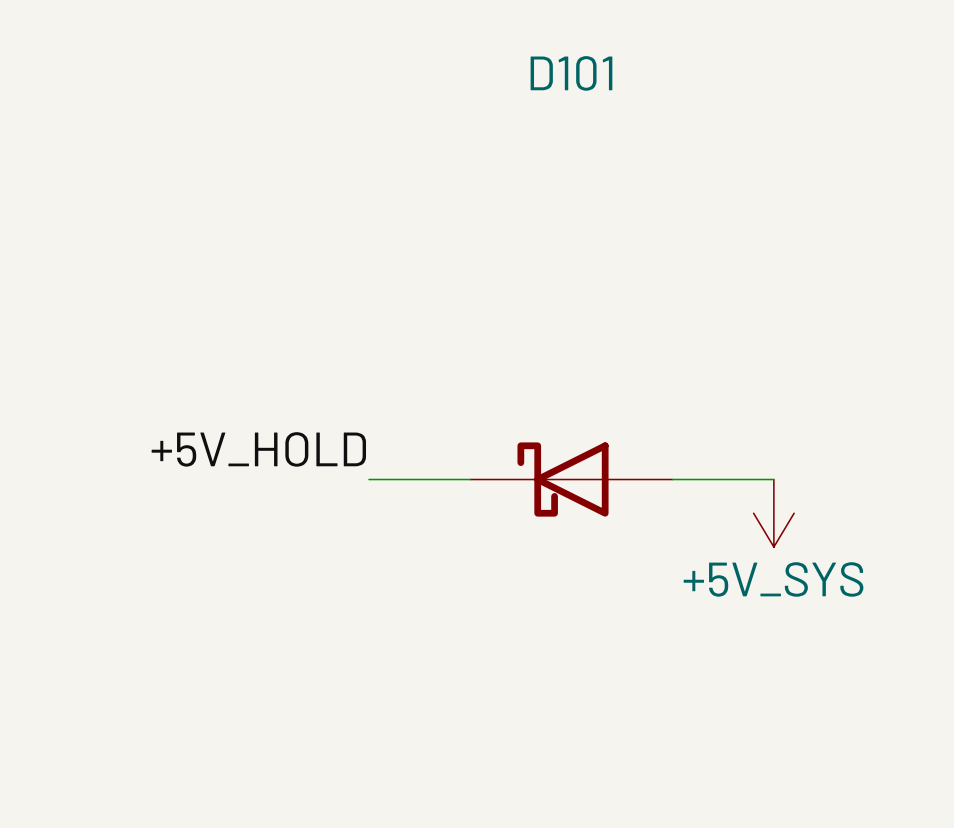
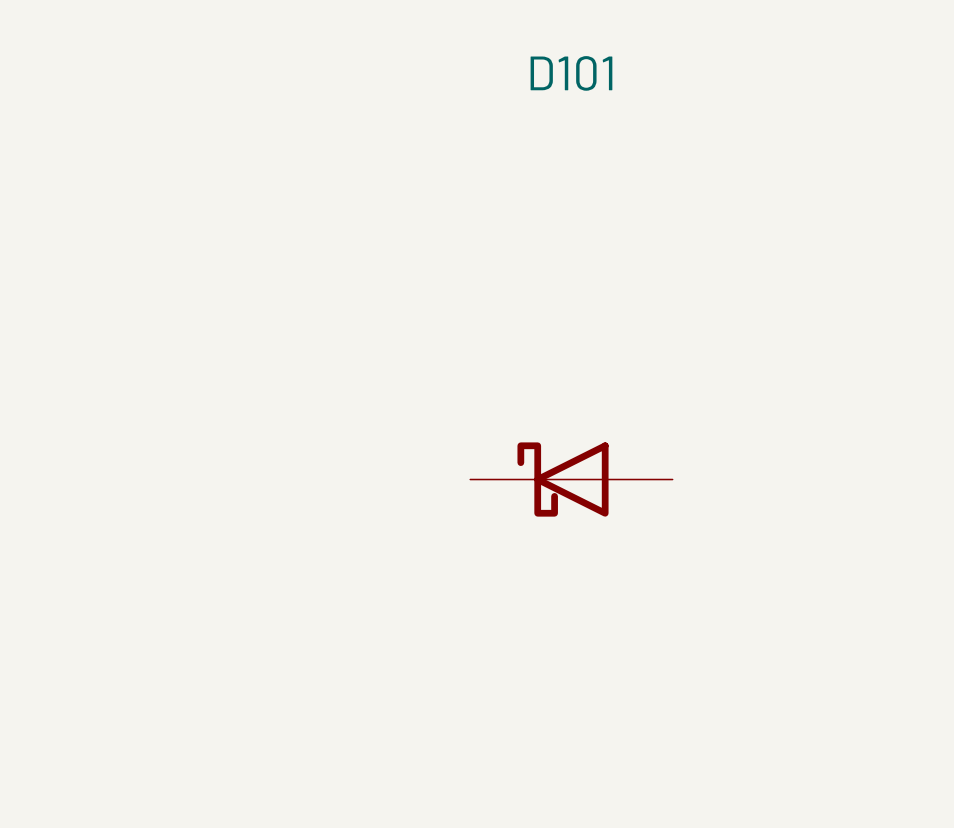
label: +5V_HOLD (258, 449) -> none
wire: (369, 479) (470, 479) -> none
wire: (672, 479) (773, 479) -> none
power symbol: +5V_SYS (773, 513) -> none

